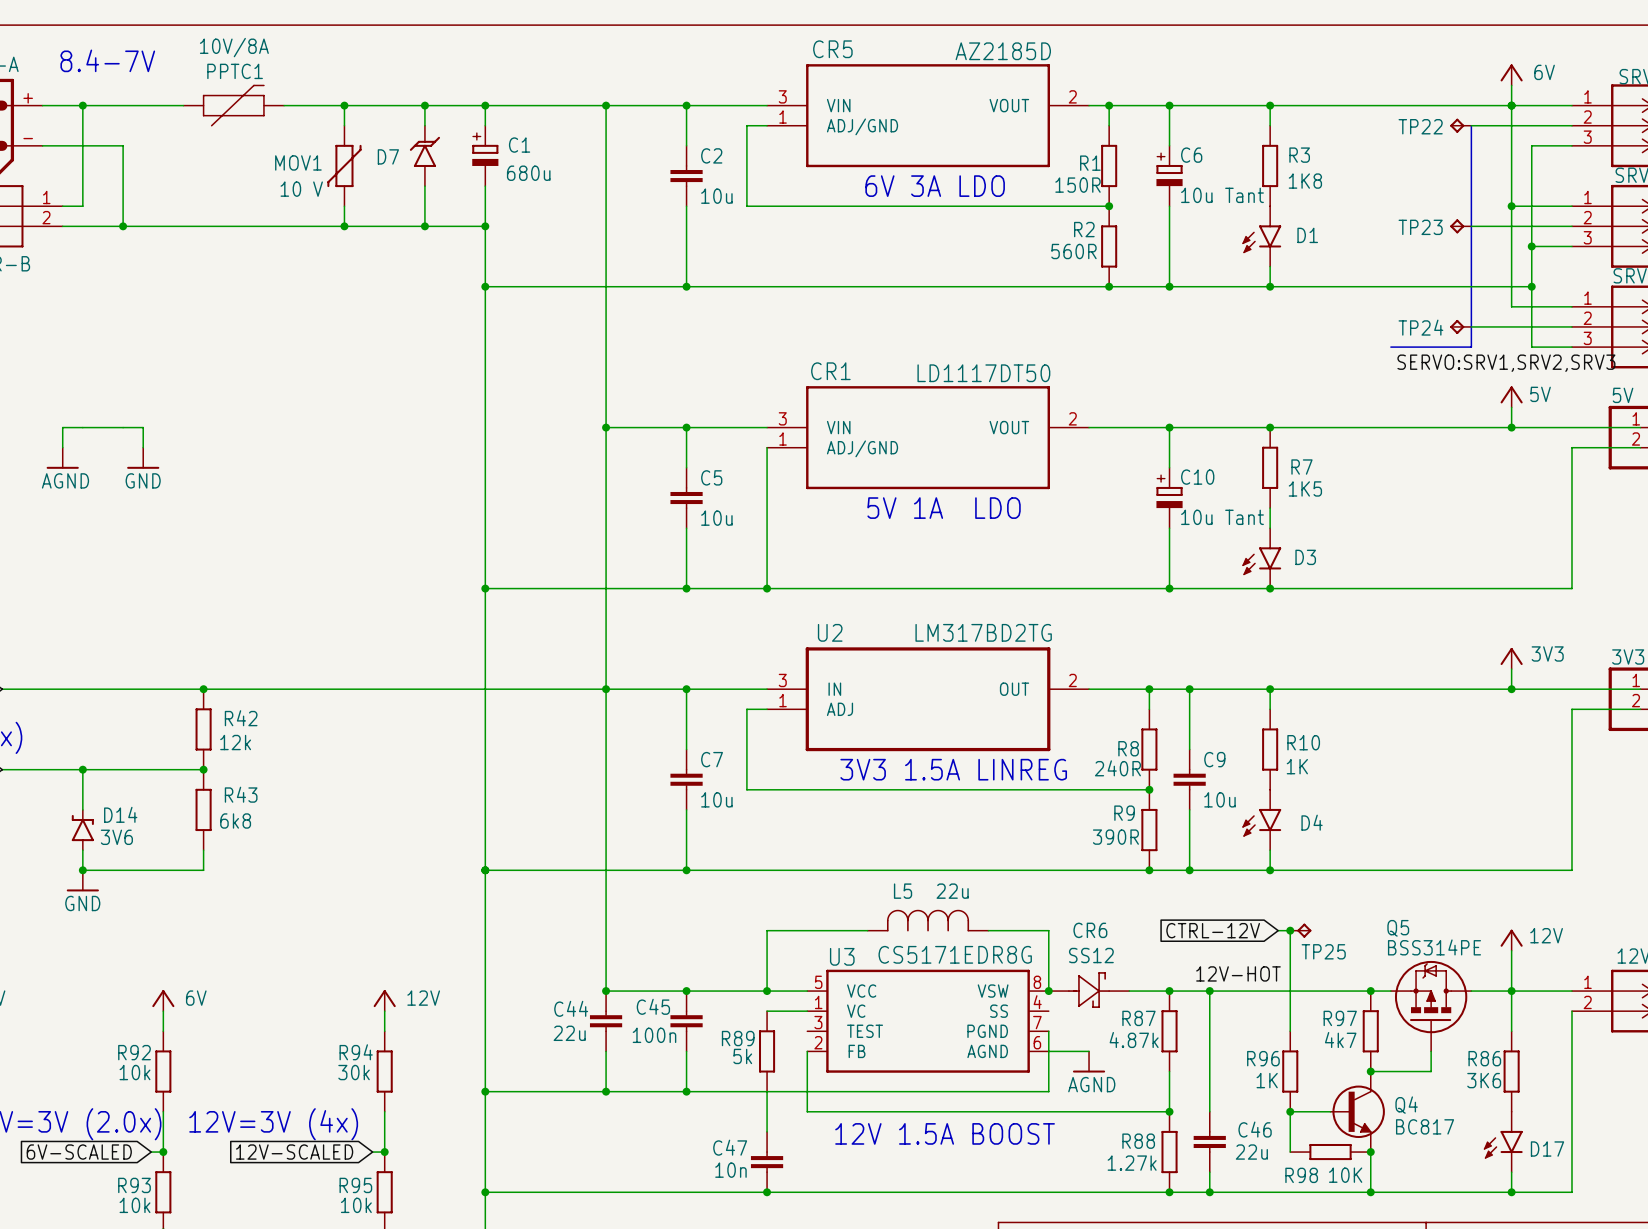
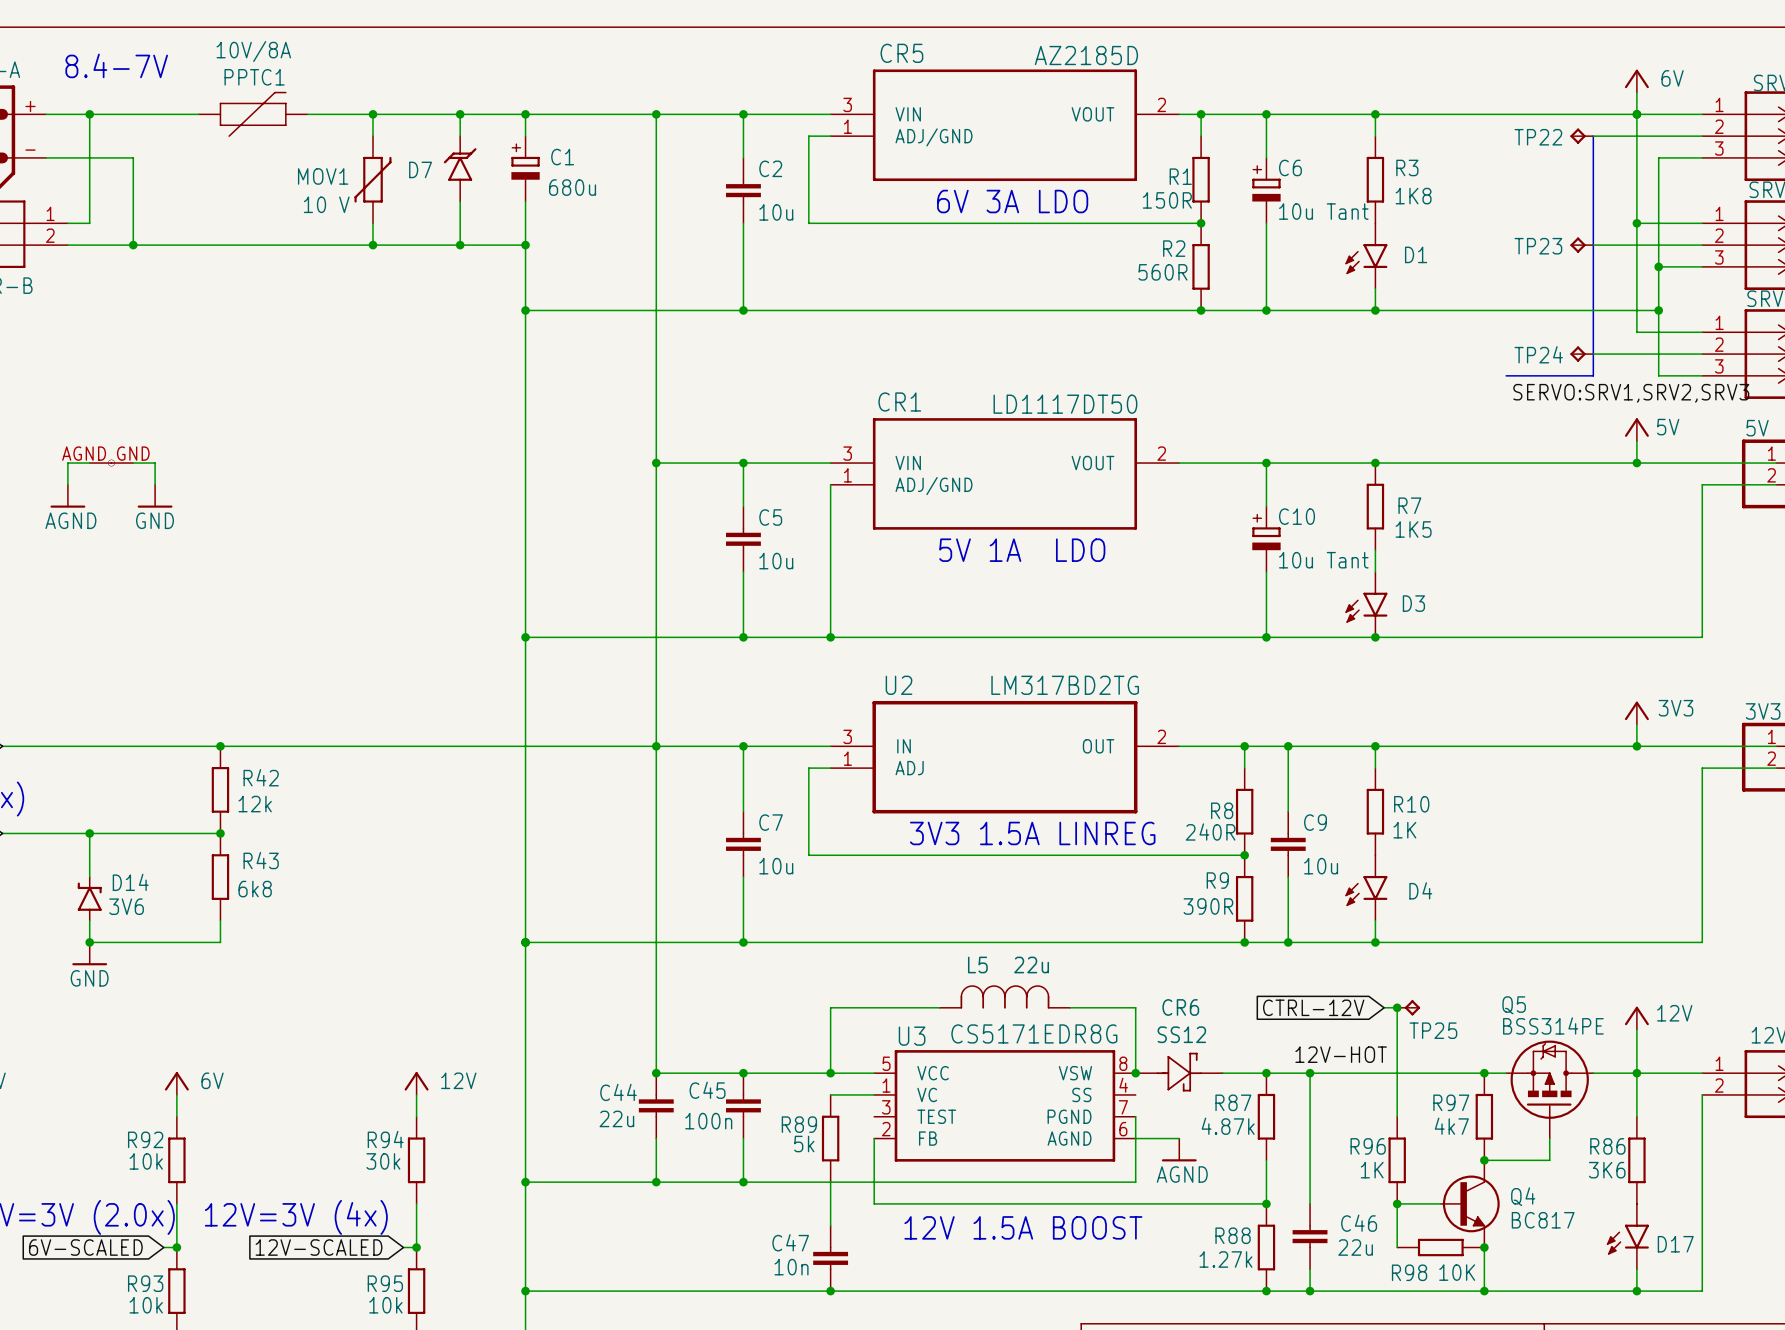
part: none -> (111, 463)

